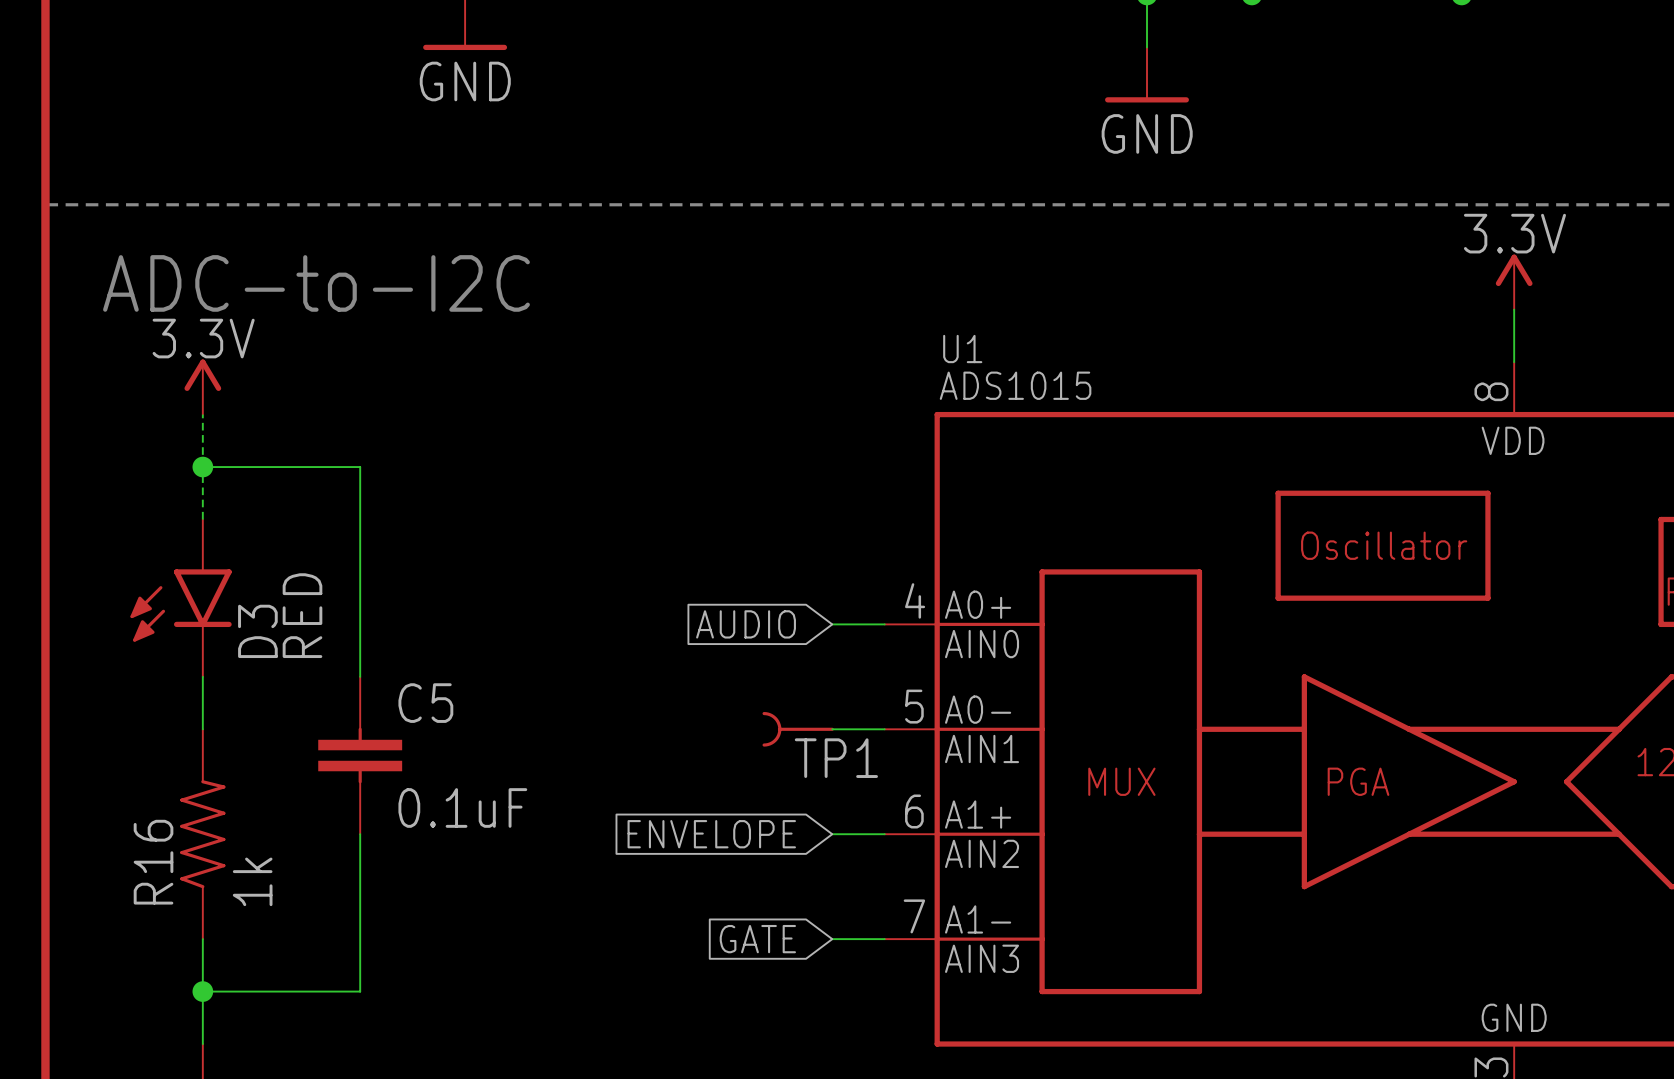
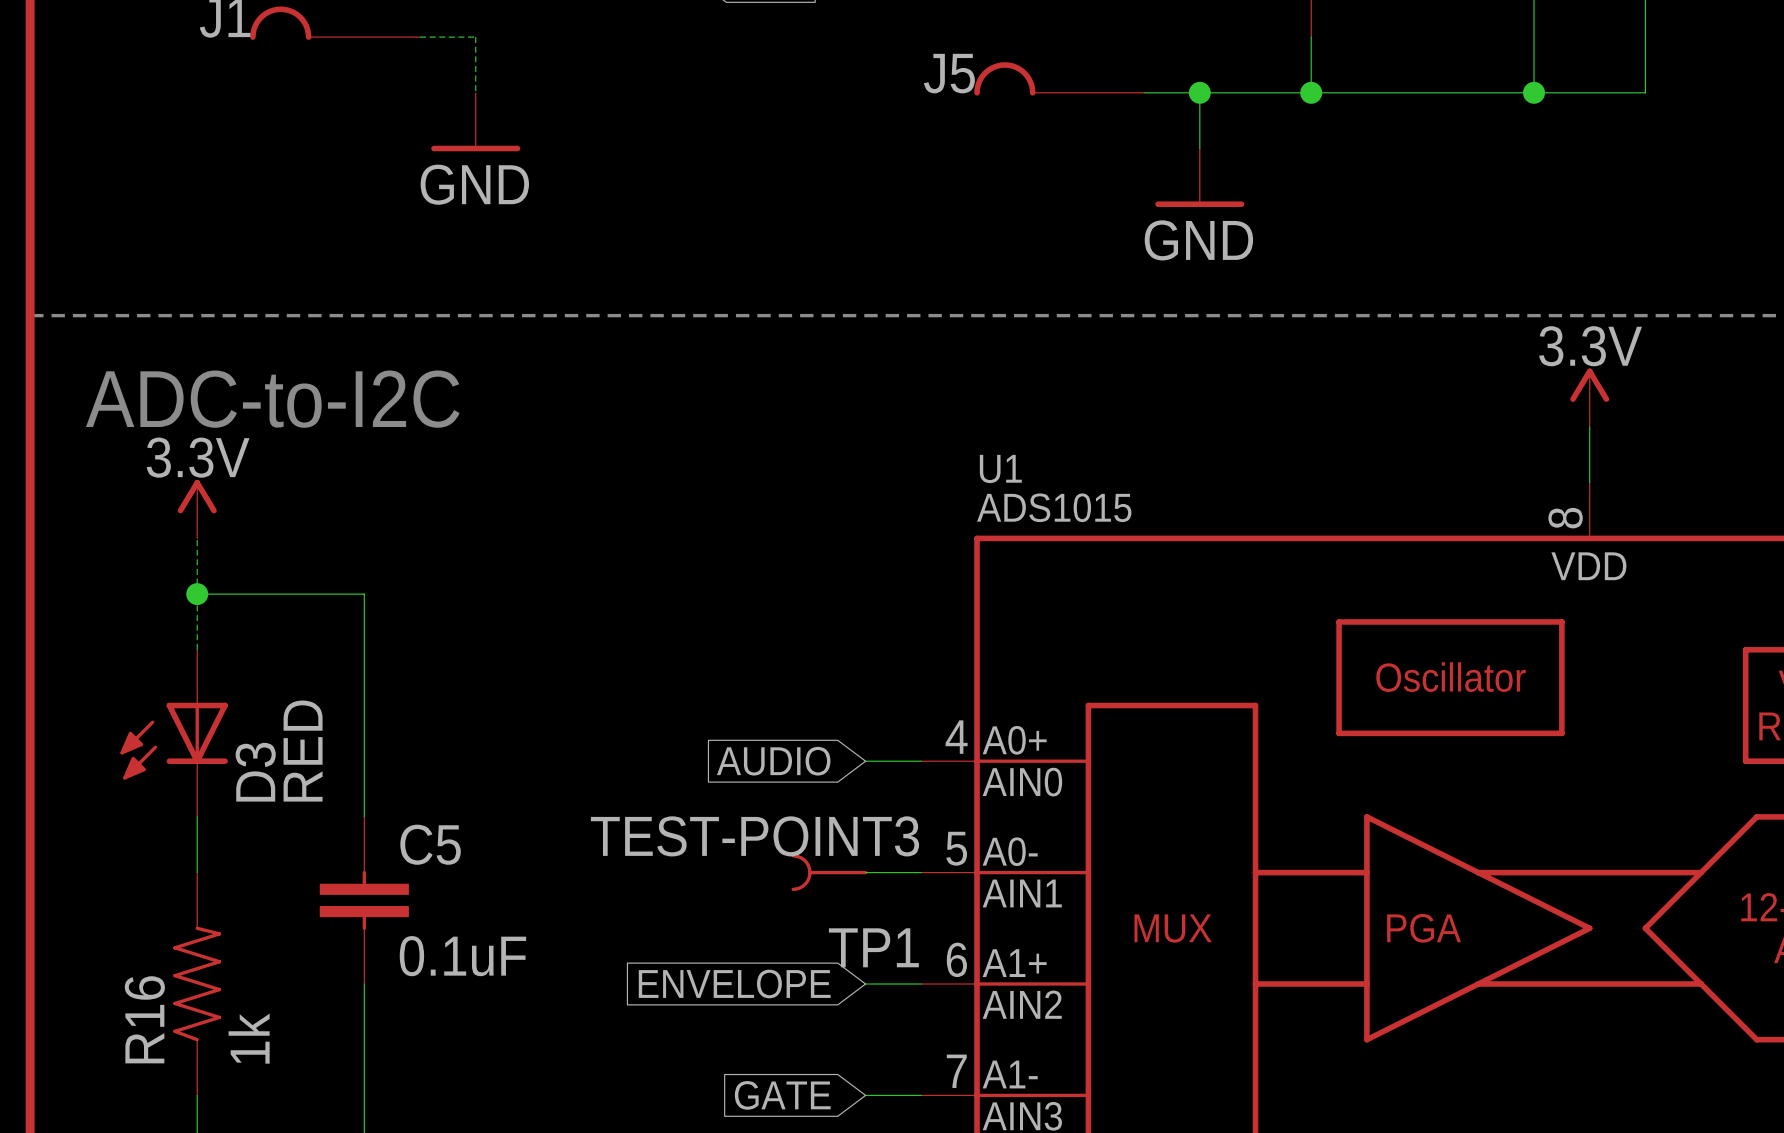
D3 symbol: [130, 519, 232, 677] -> [120, 649, 228, 817]
TP1 value: none -> TEST-POINT3 (754, 836)
TP1 name position: TP1 (836, 758) -> TP1 (873, 947)

